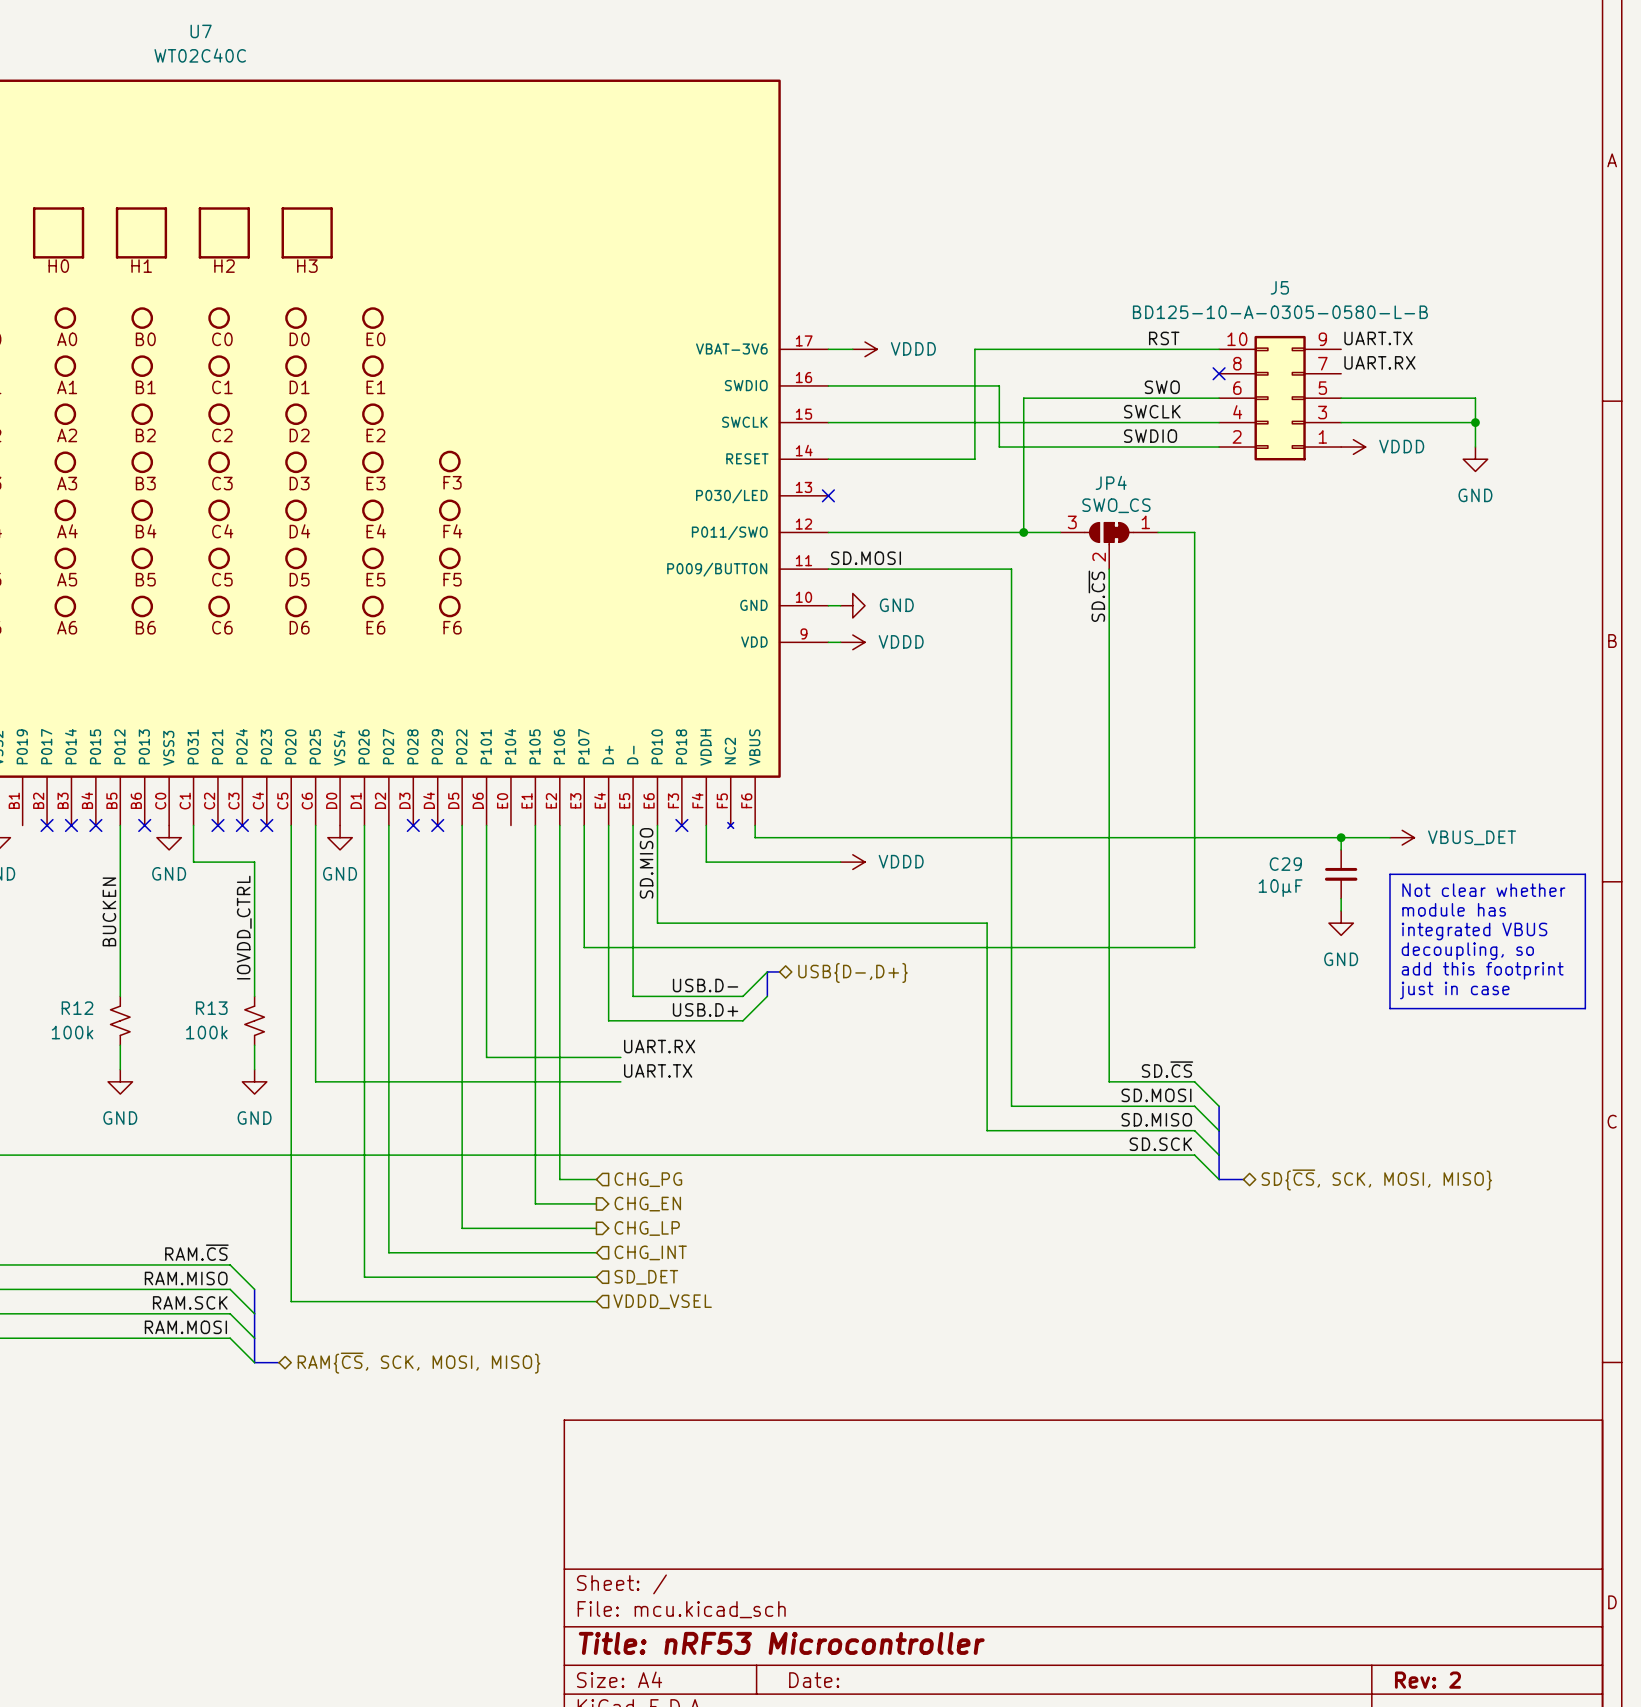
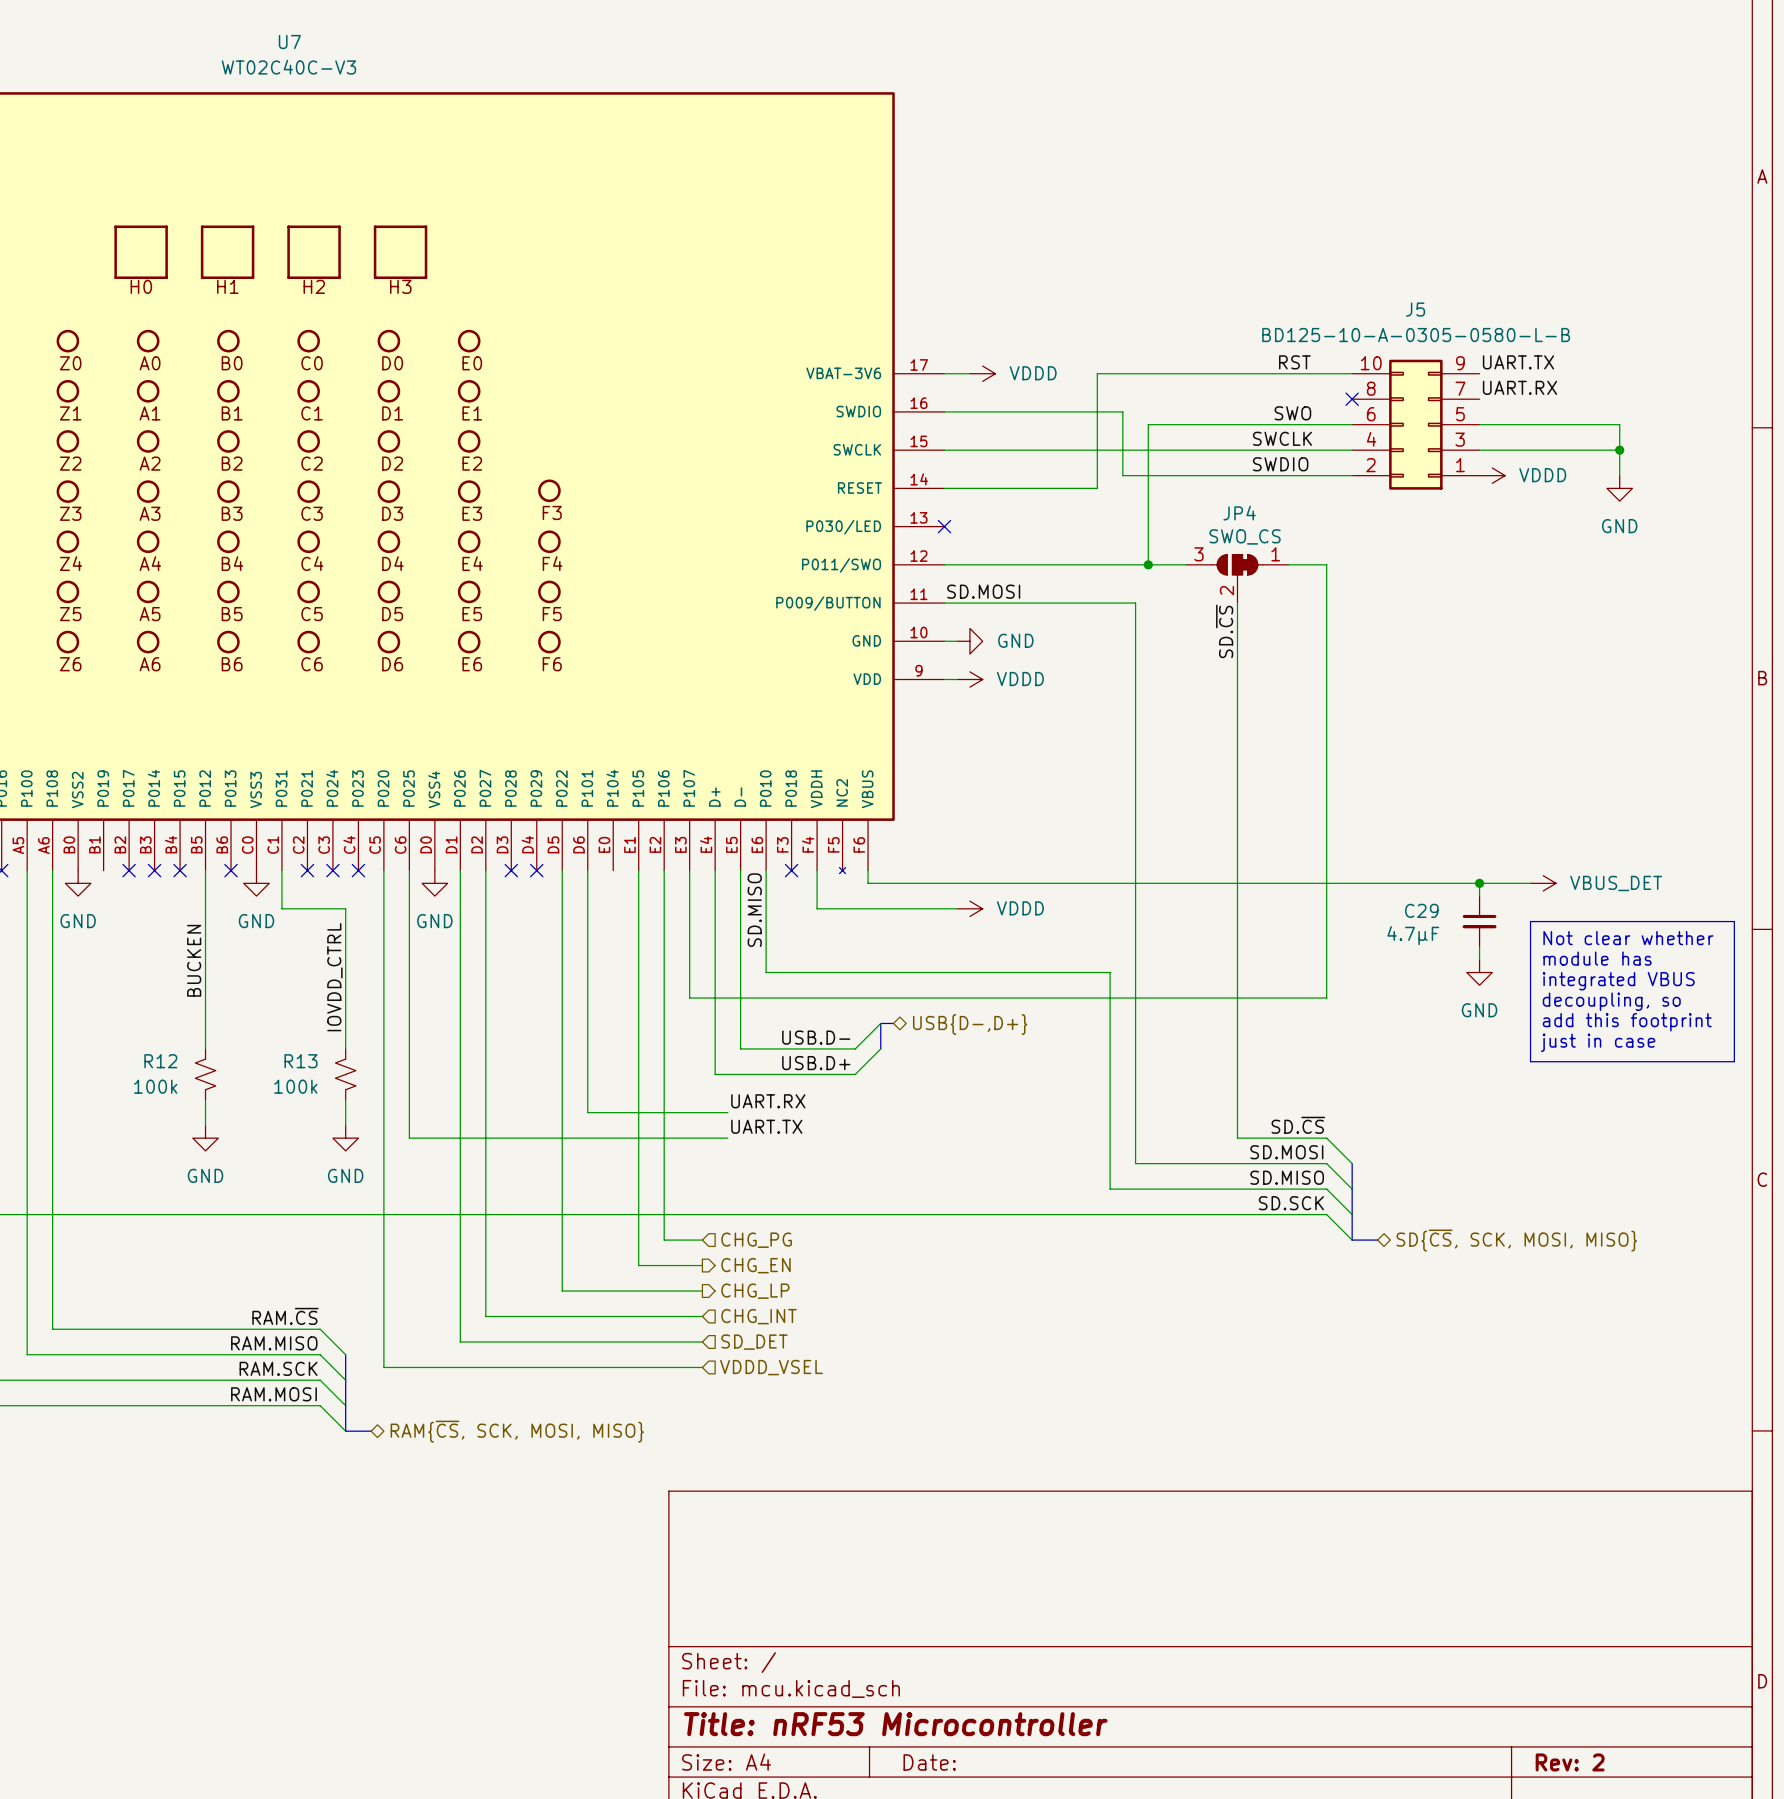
U7 value: WT02C40C (200, 55) -> WT02C40C-V3 (288, 67)
C29 value: 10µF (1280, 888) -> 4.7µF (1413, 935)

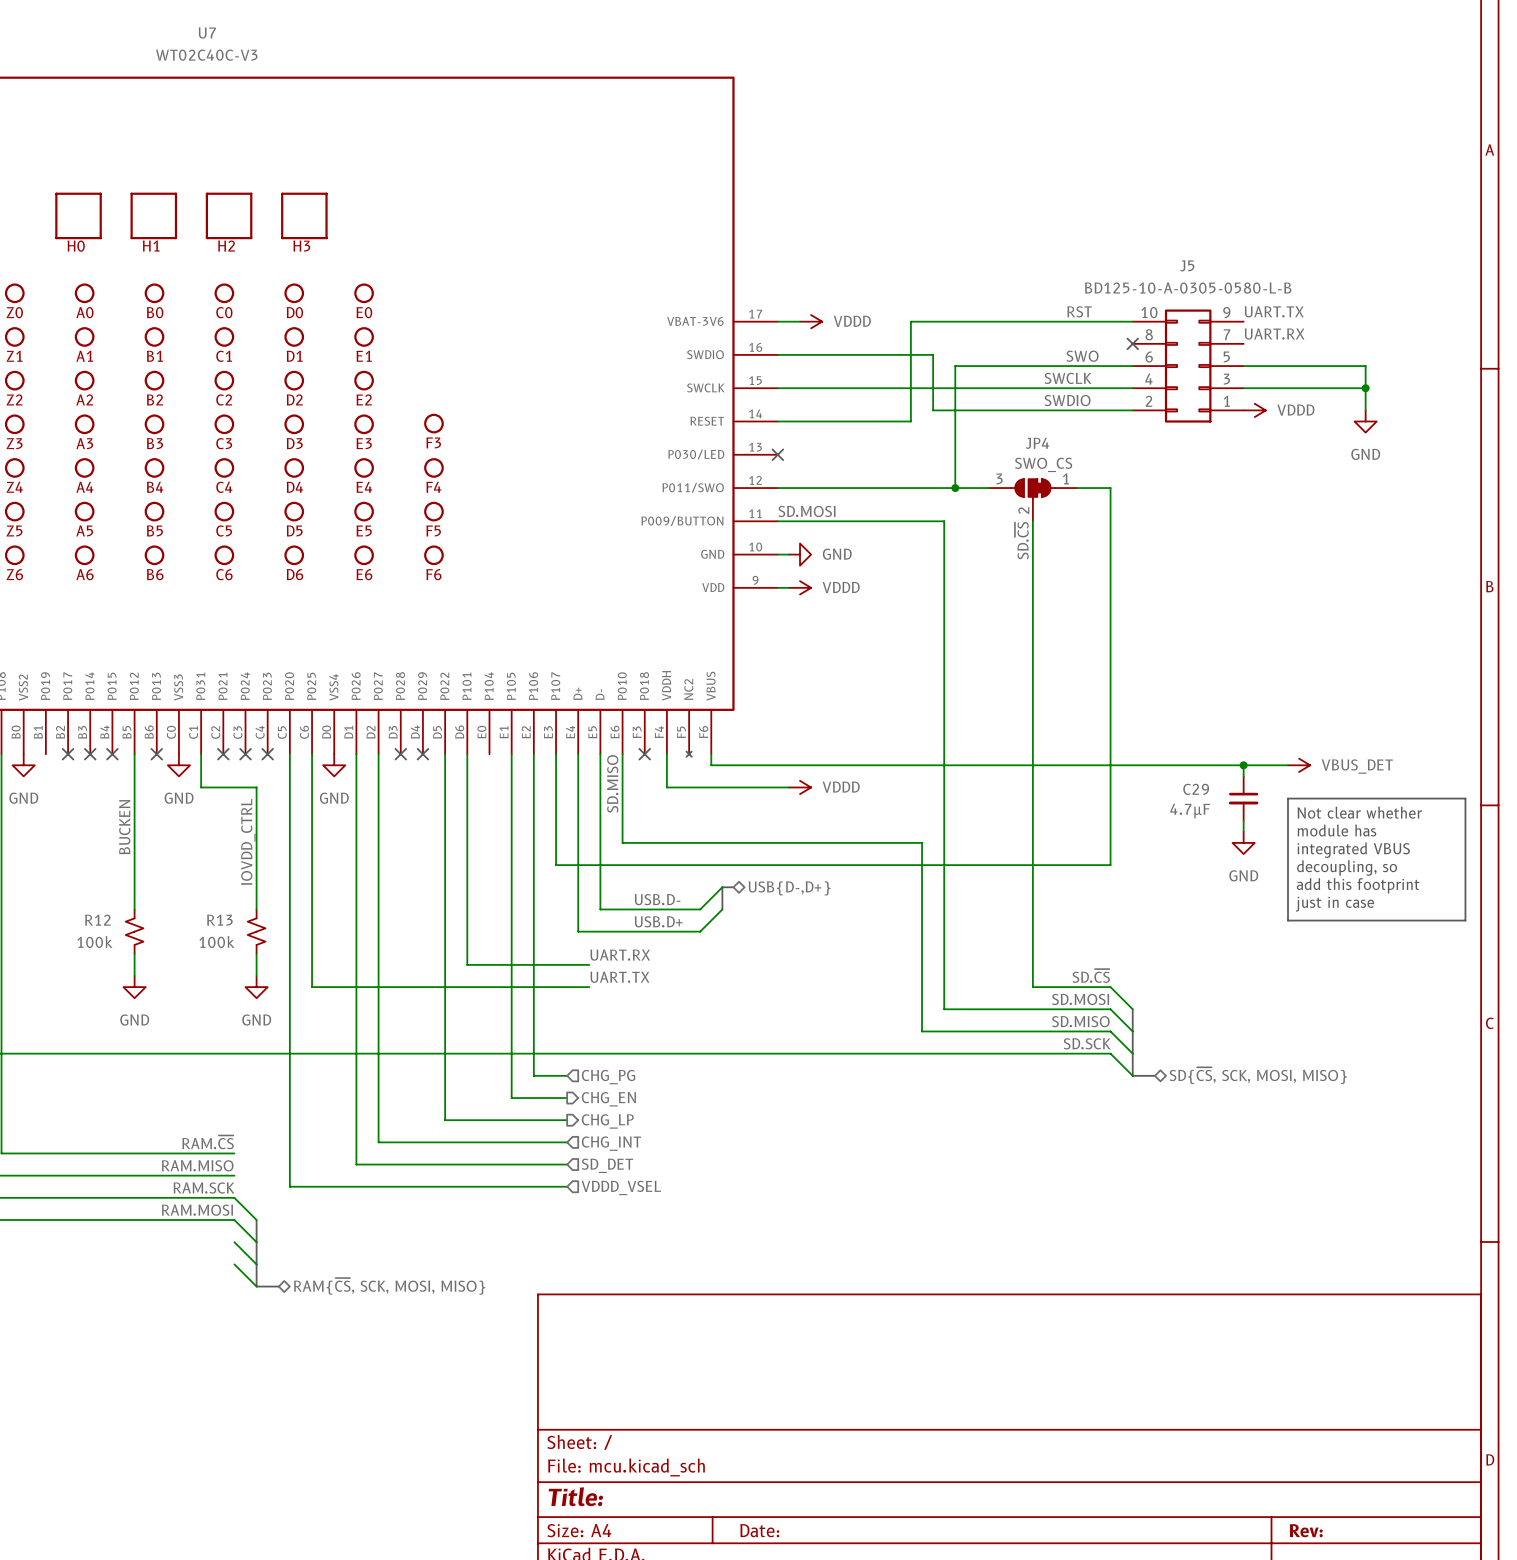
wire: (320, 1329) (345, 1354) -> (234, 1264) (256, 1286)
wire: (320, 1354) (345, 1380) -> (234, 1242) (256, 1264)
bus: (345, 1354) (345, 1405) -> none
bus: (345, 1431) (371, 1431) -> (256, 1242) (256, 1286) (278, 1286)
hierarchical label position: RAM{~{CS}, SCK, MOSI, MISO} (517, 1431) -> RAM{~{CS}, SCK, MOSI, MISO} (389, 1286)
title block: Title: nRF53 Microcontroller (895, 1724) -> Title: (575, 1496)
title block: Rev: 2 (1570, 1762) -> Rev: (1306, 1530)

